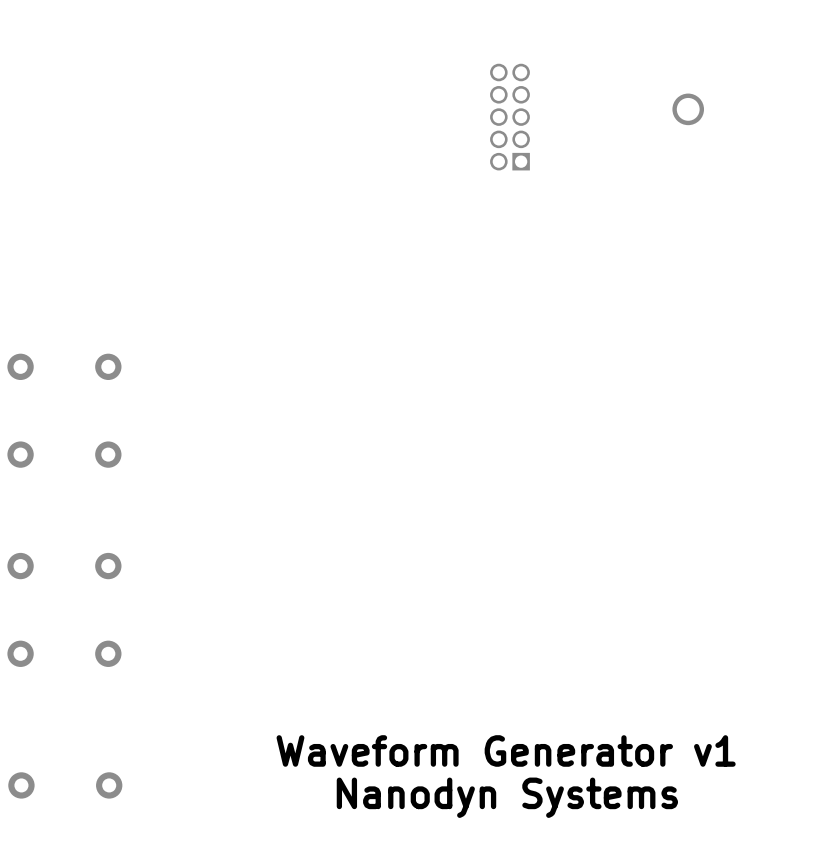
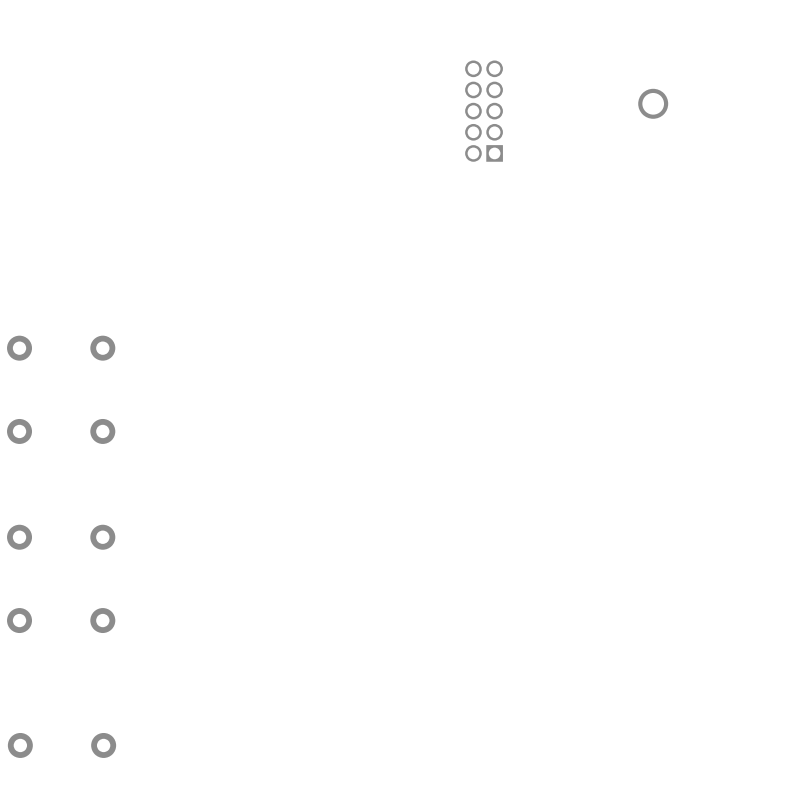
text: Waveform Generator v1 (506, 750) -> none
text: Nanodyn Systems (507, 797) -> none

